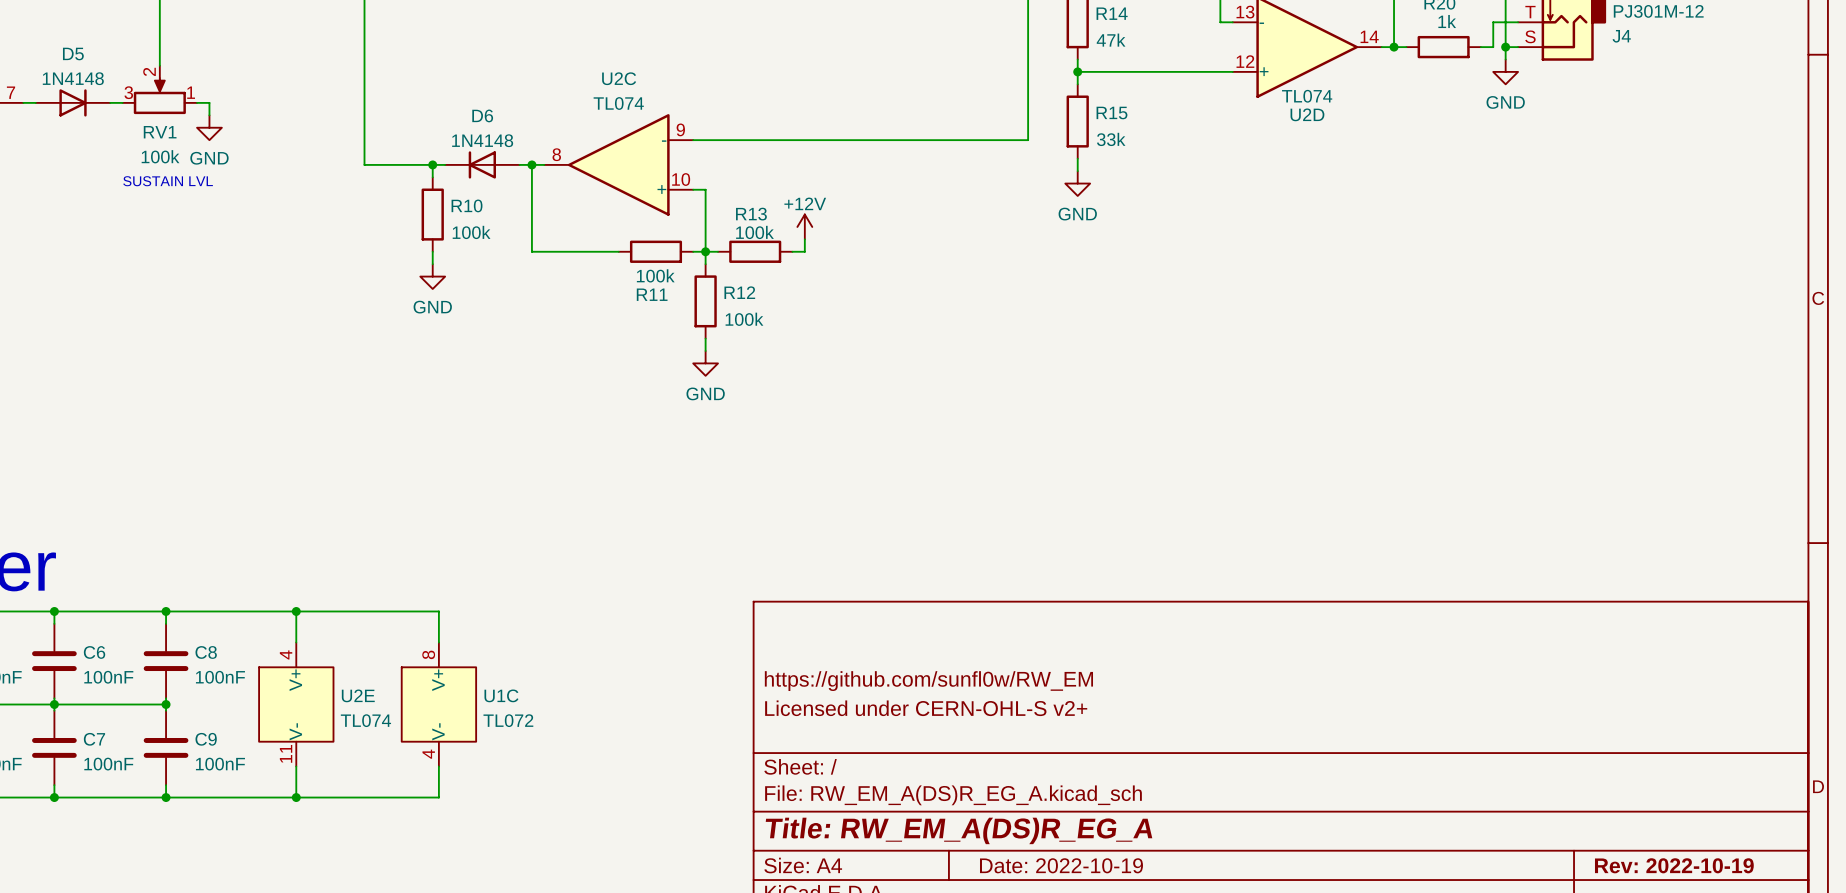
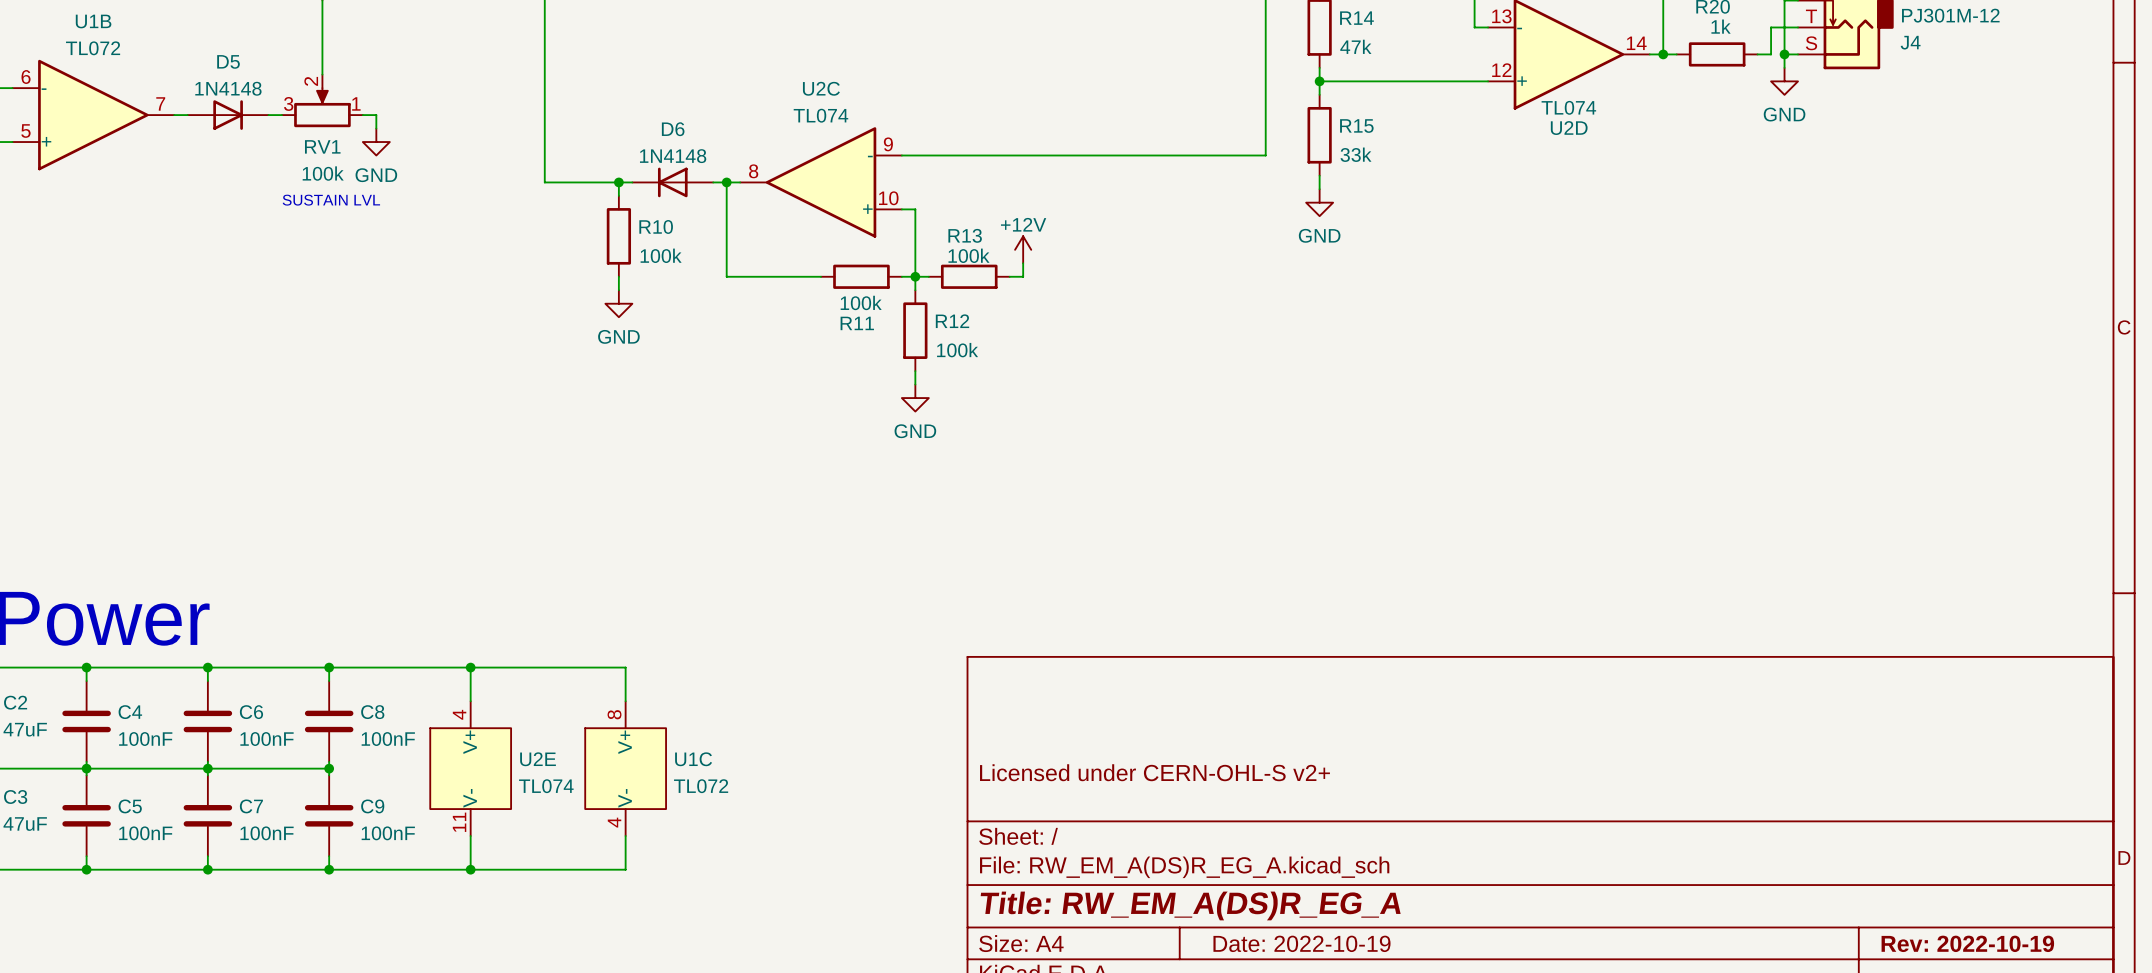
title block: https://github.com/sunfl0w/RW_EM (928, 681) -> none

